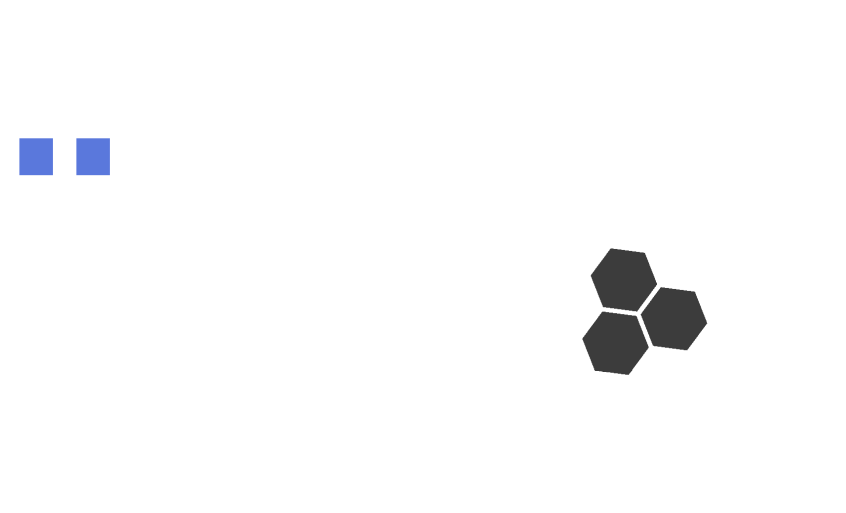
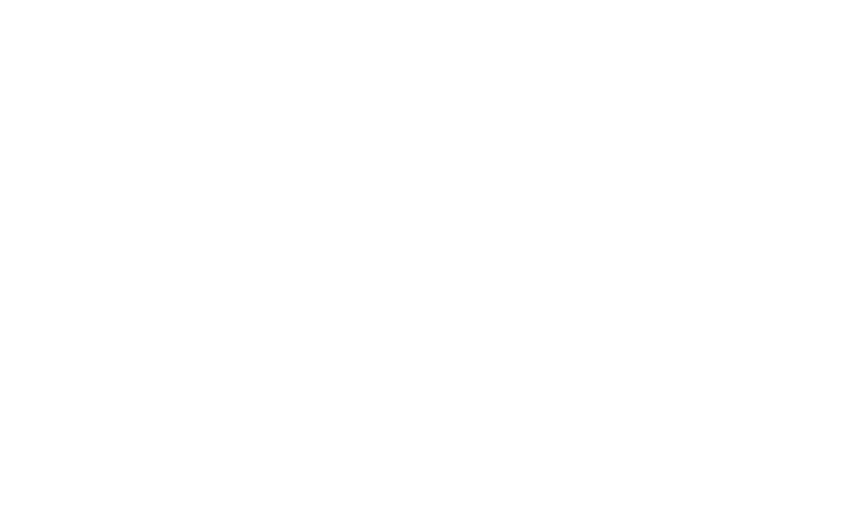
part: (64, 156) -> none
drawing: [582, 248, 708, 375] -> none

